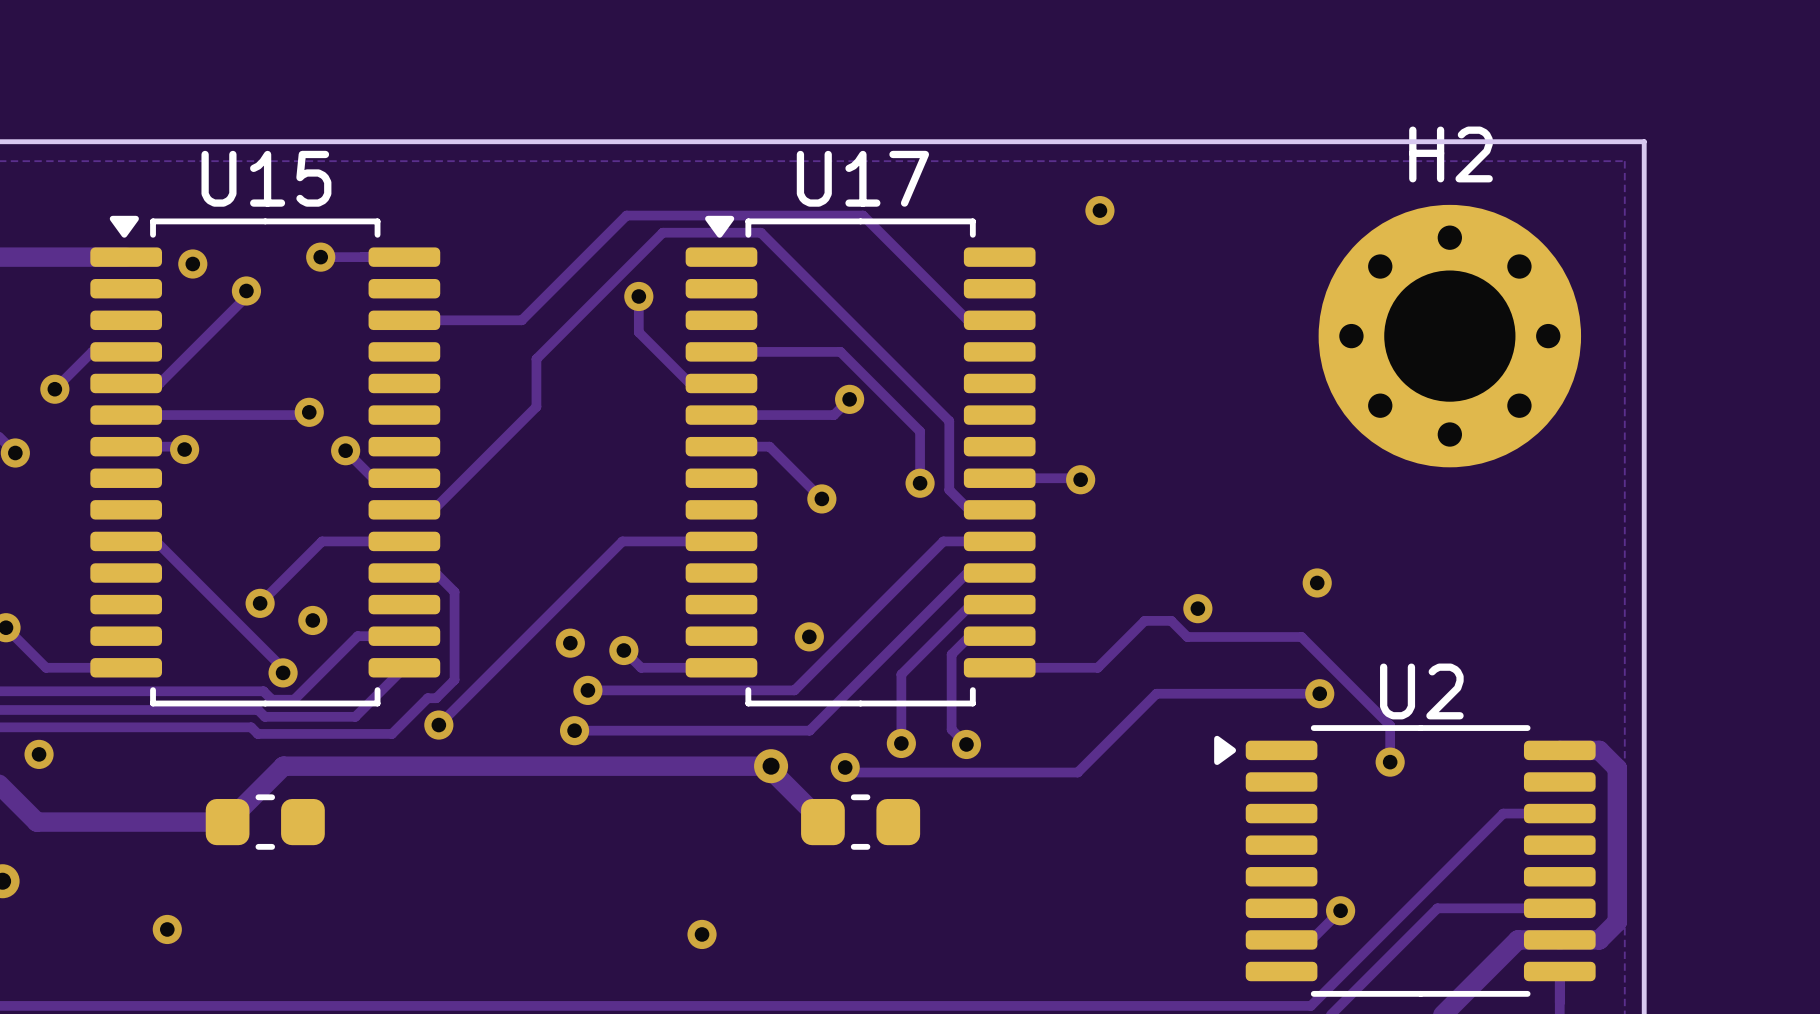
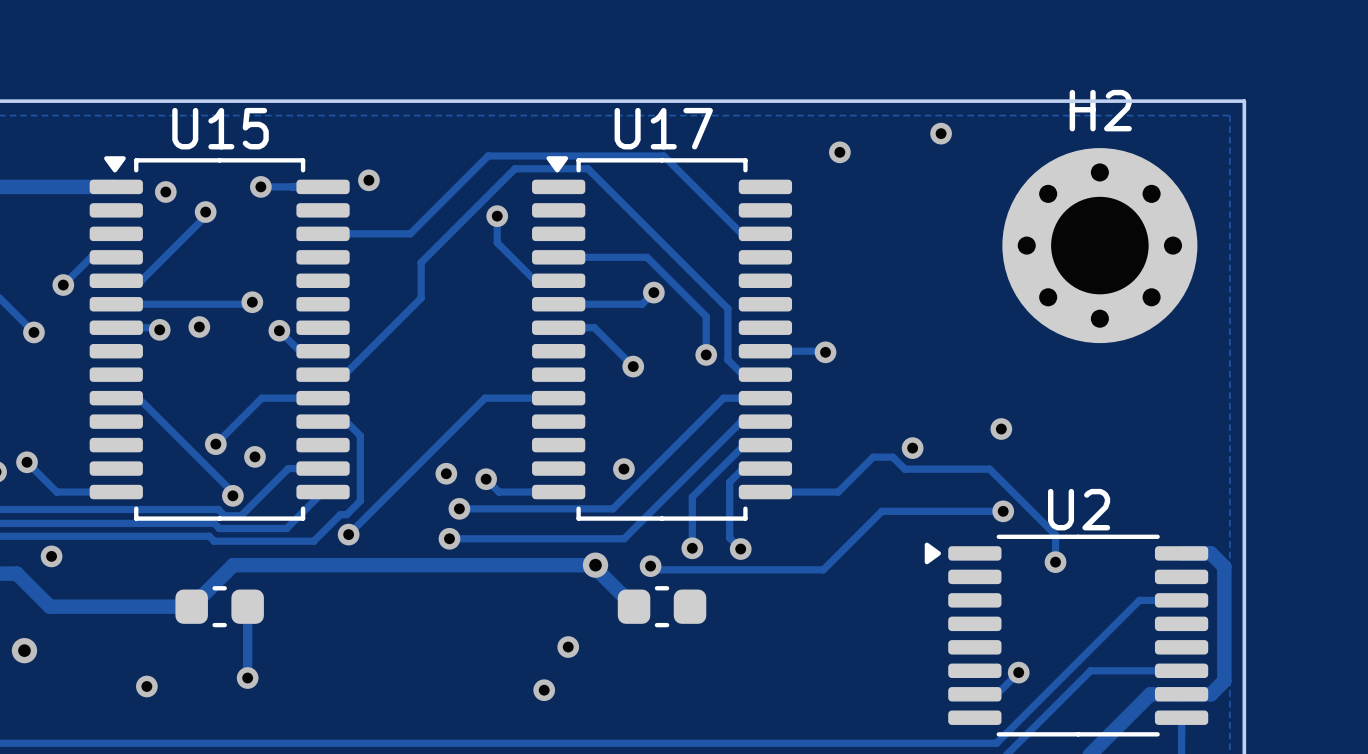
via: none -> (941, 133)
via: none -> (368, 180)
via: none -> (199, 327)
track: none -> (247, 606) (247, 678)
via: none -> (568, 647)
via: none -> (247, 678)

